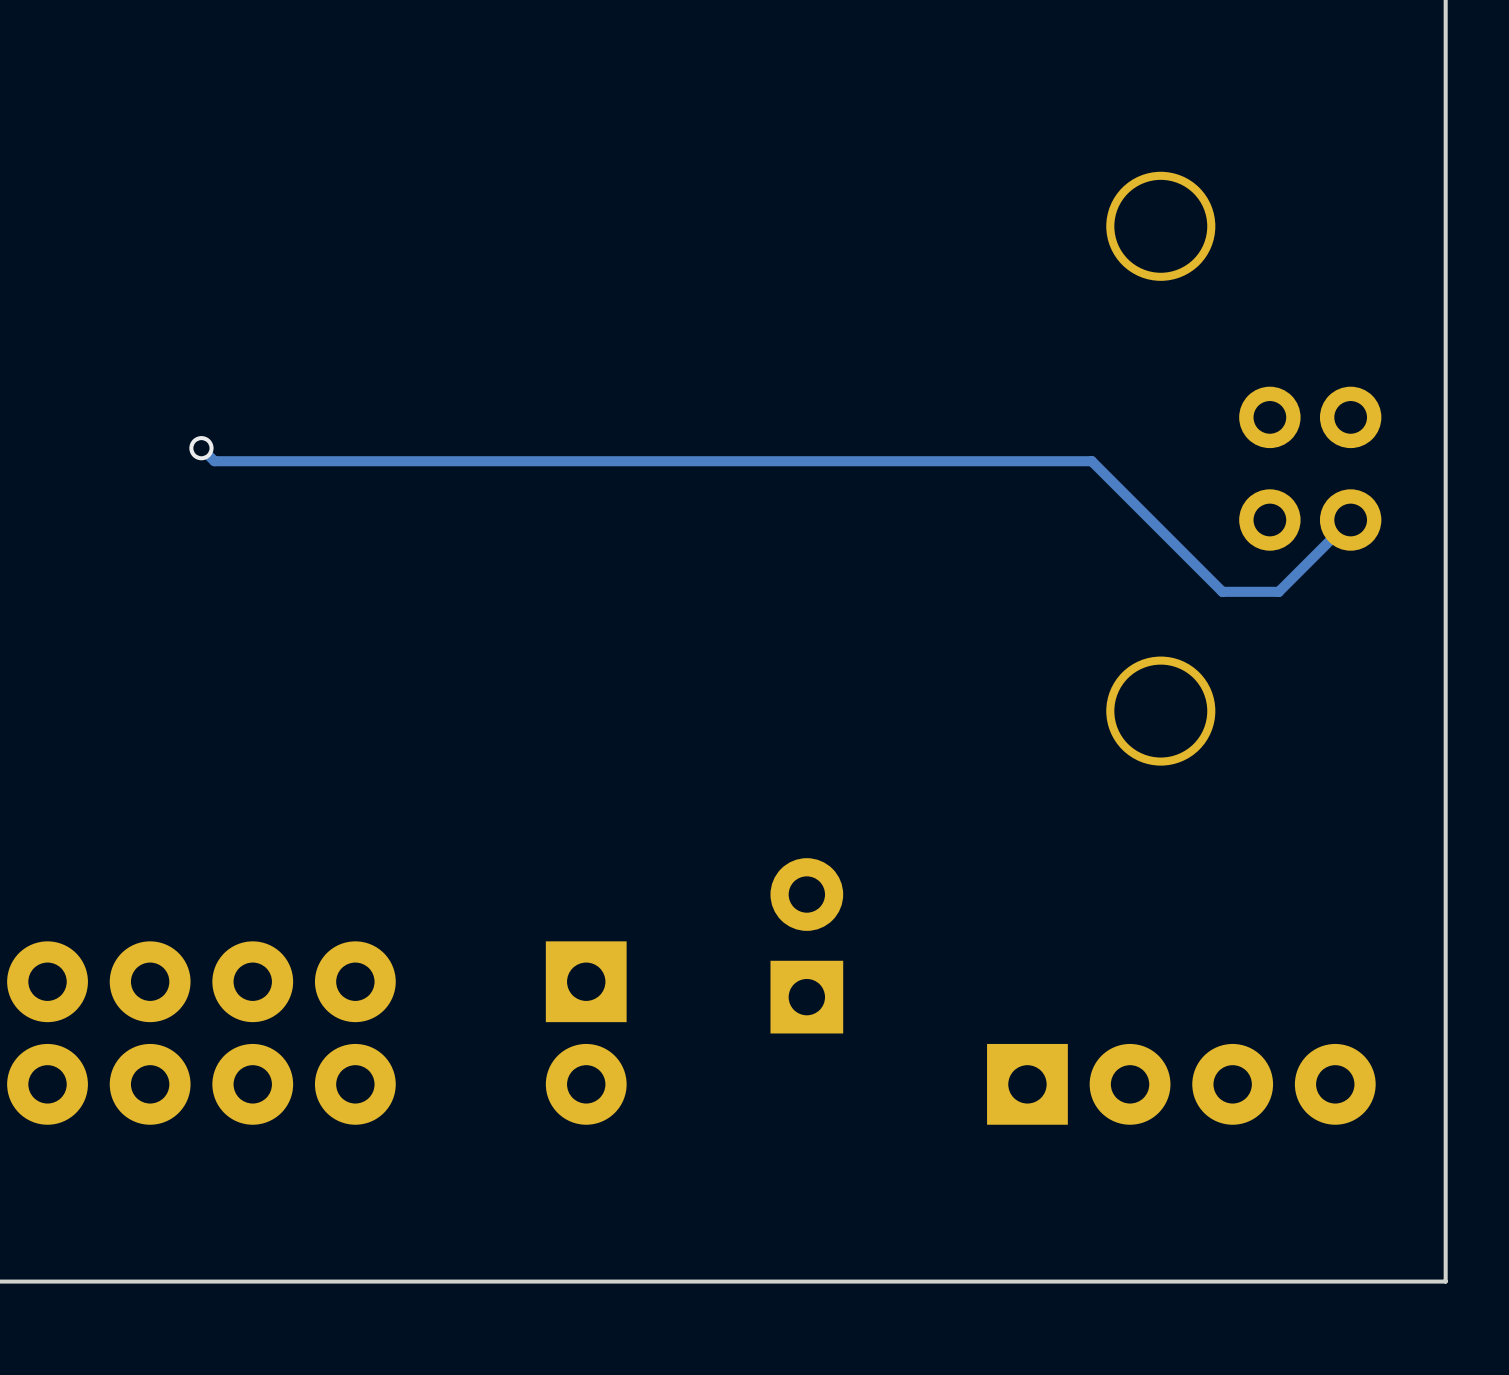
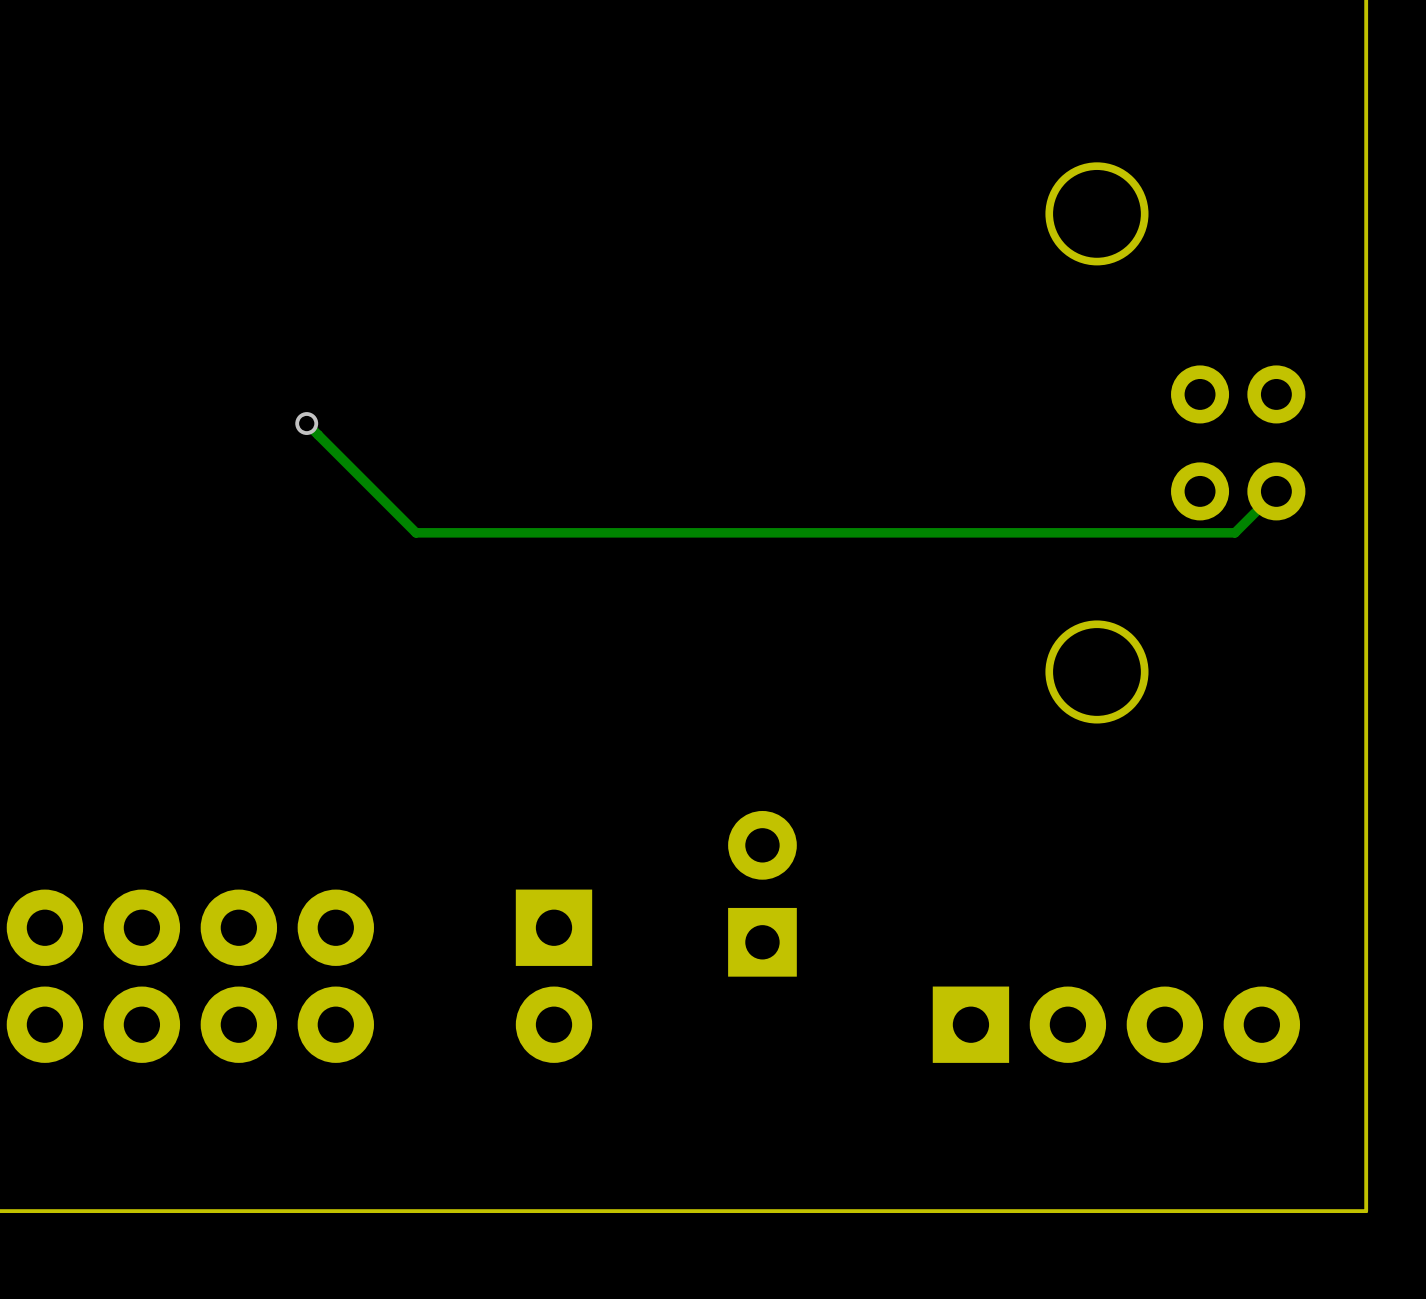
track: (201, 448) (214, 461) (1091, 461) (1222, 591) (1278, 591) (1306, 563) -> (306, 423) (416, 532) (1234, 532)
via position: (201, 448) -> (306, 423)

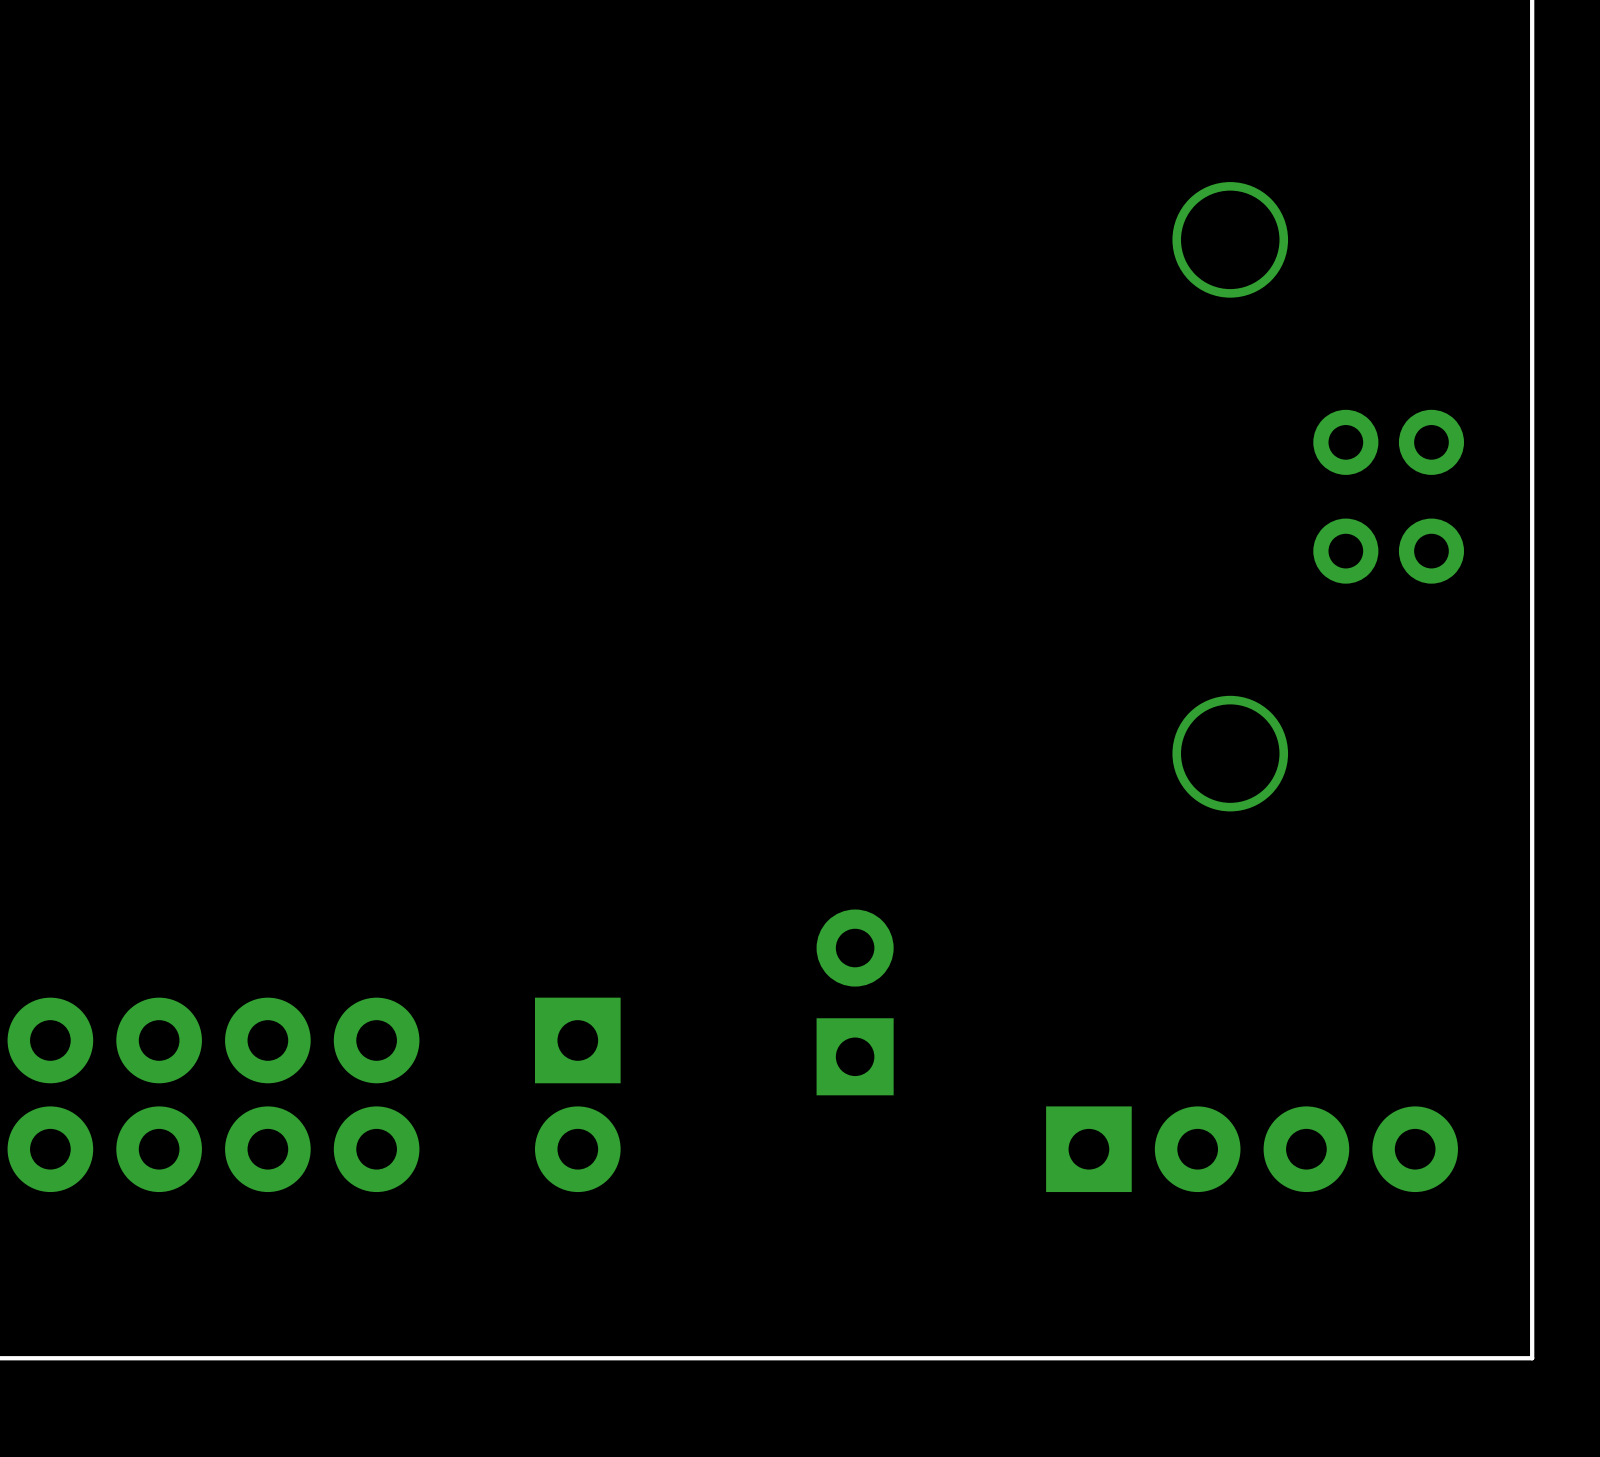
track: (306, 423) (416, 532) (1234, 532) (1276, 491) -> none
via: (306, 423) -> none
part position: (553, 976) -> (577, 1094)

